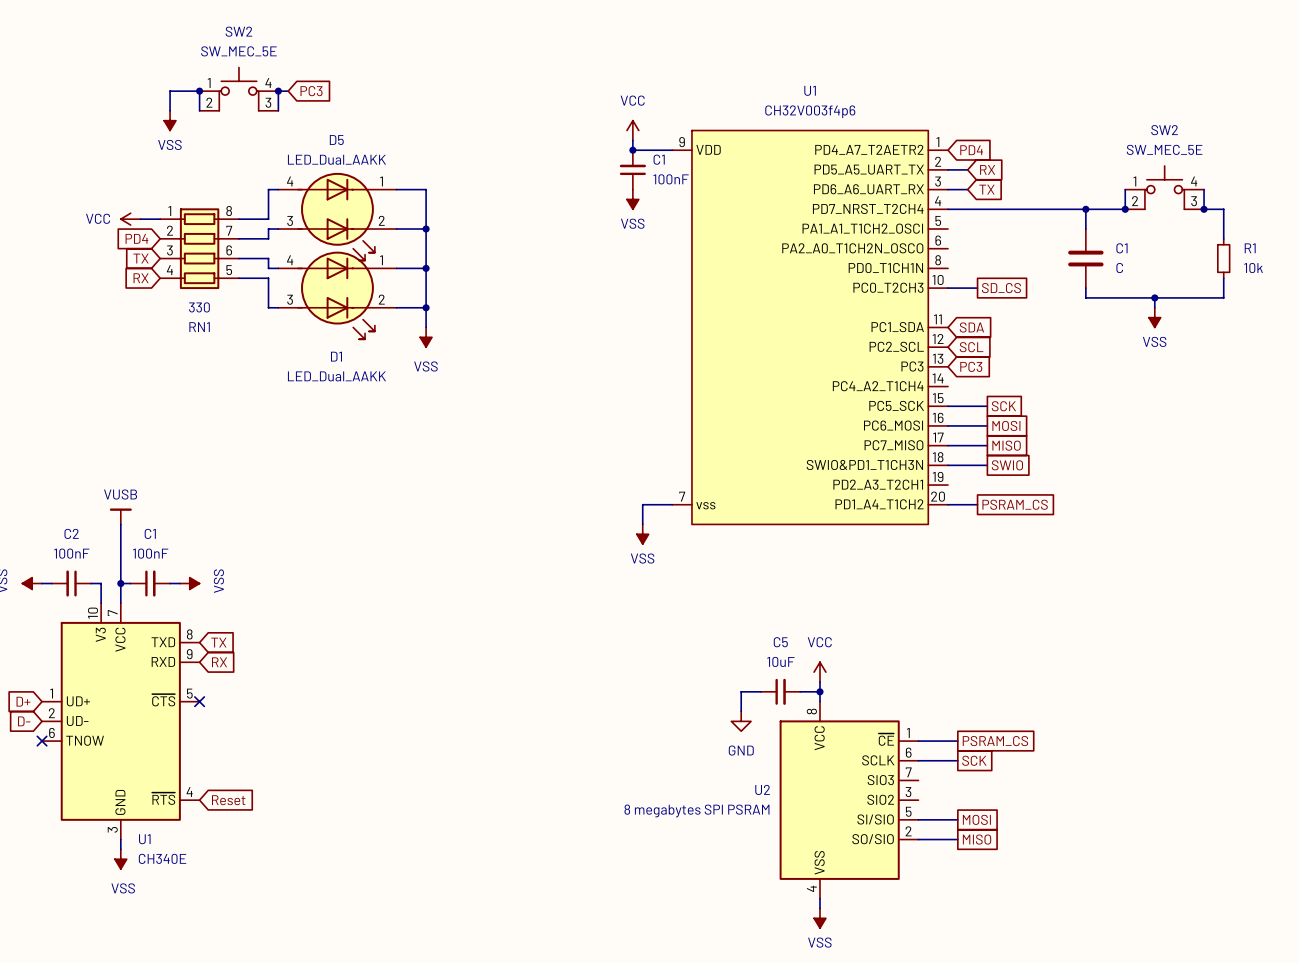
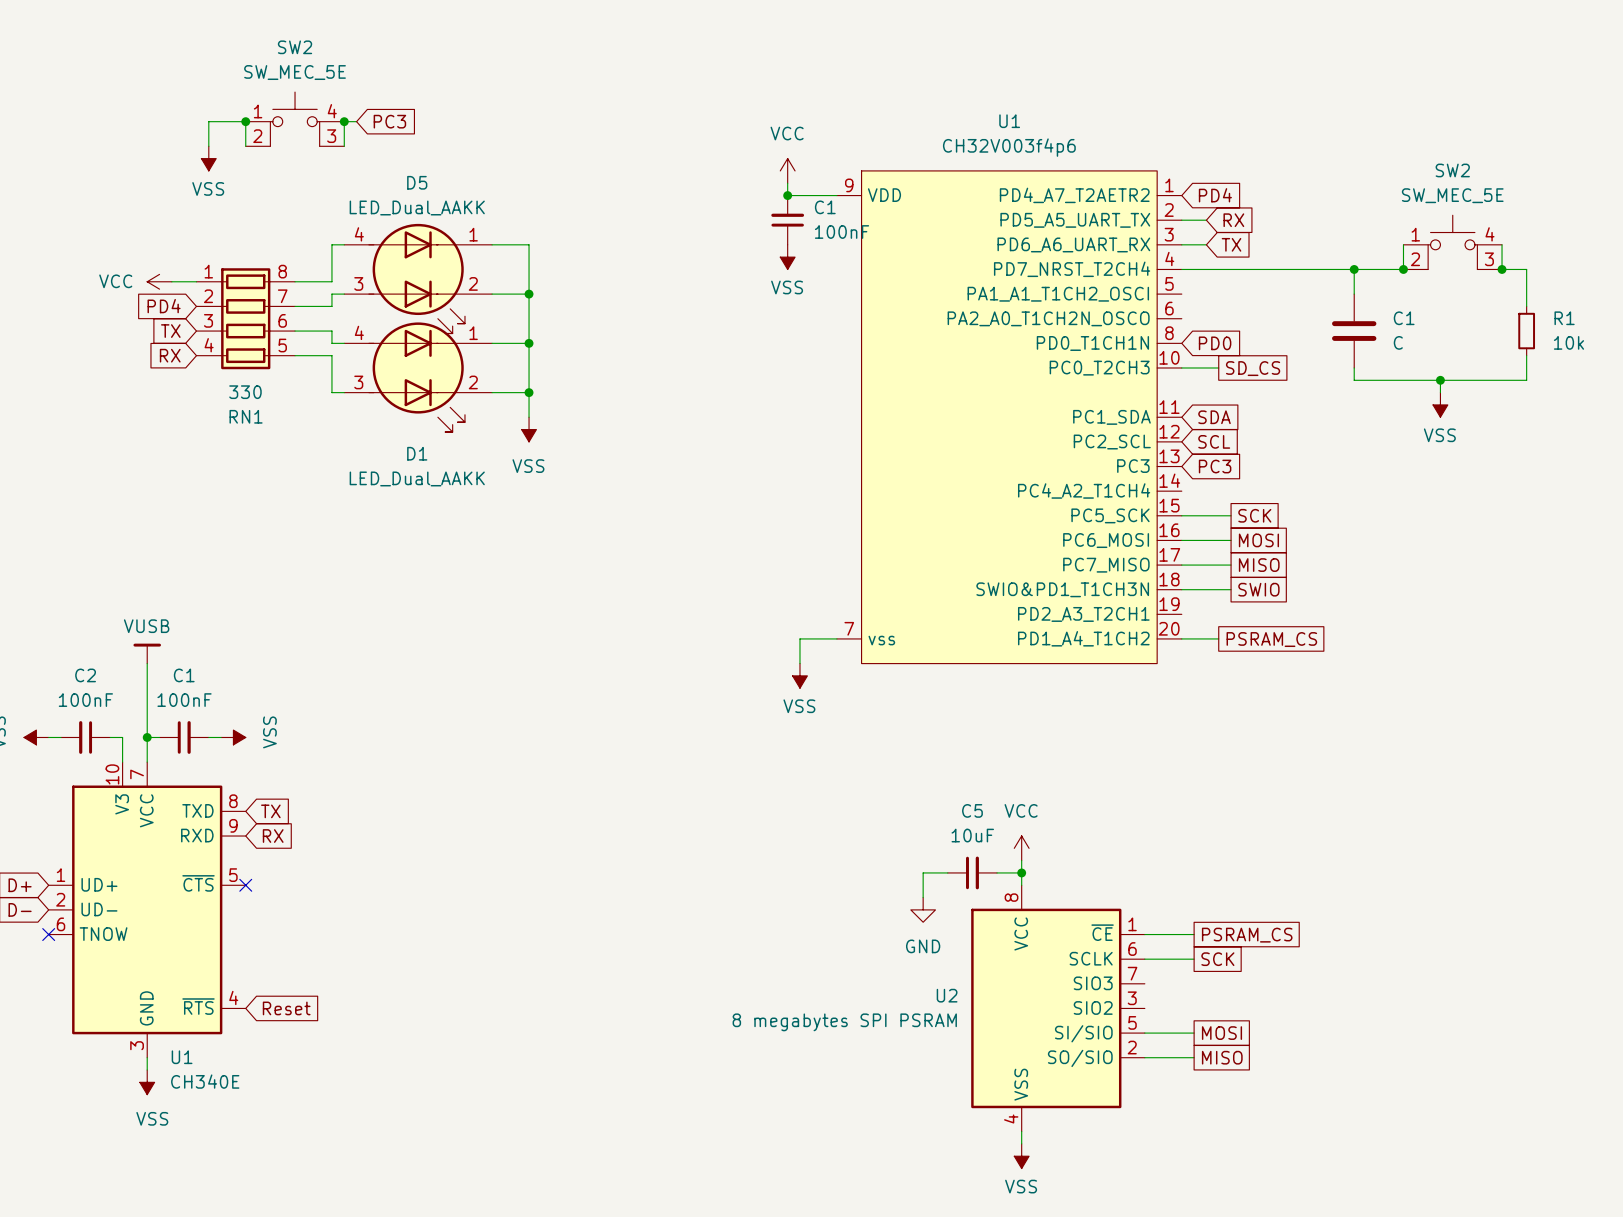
global label: none -> PD0 (1215, 343)

